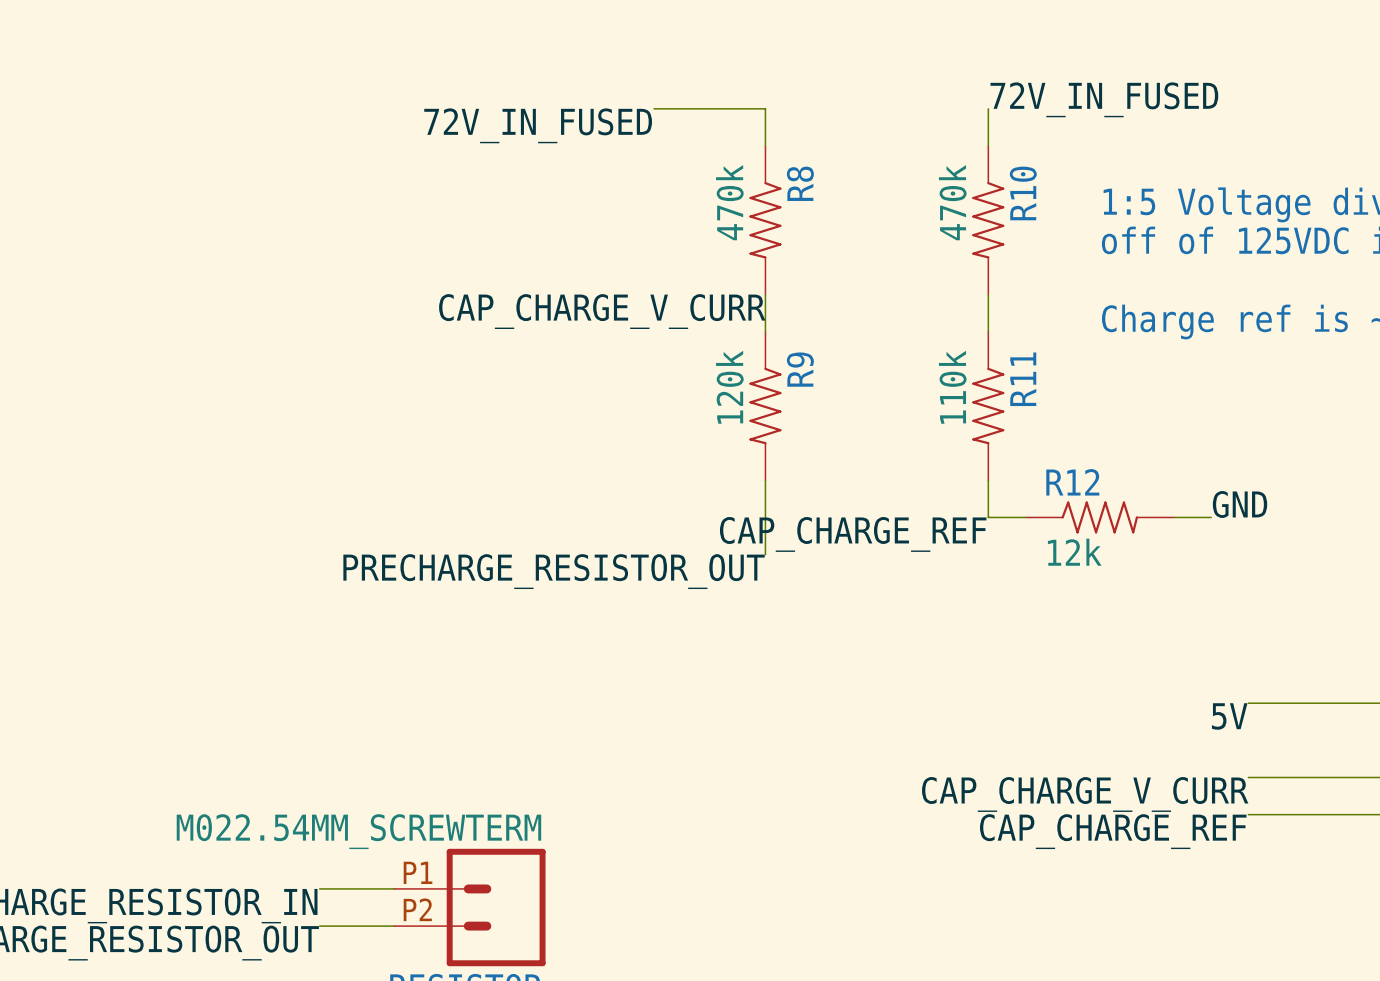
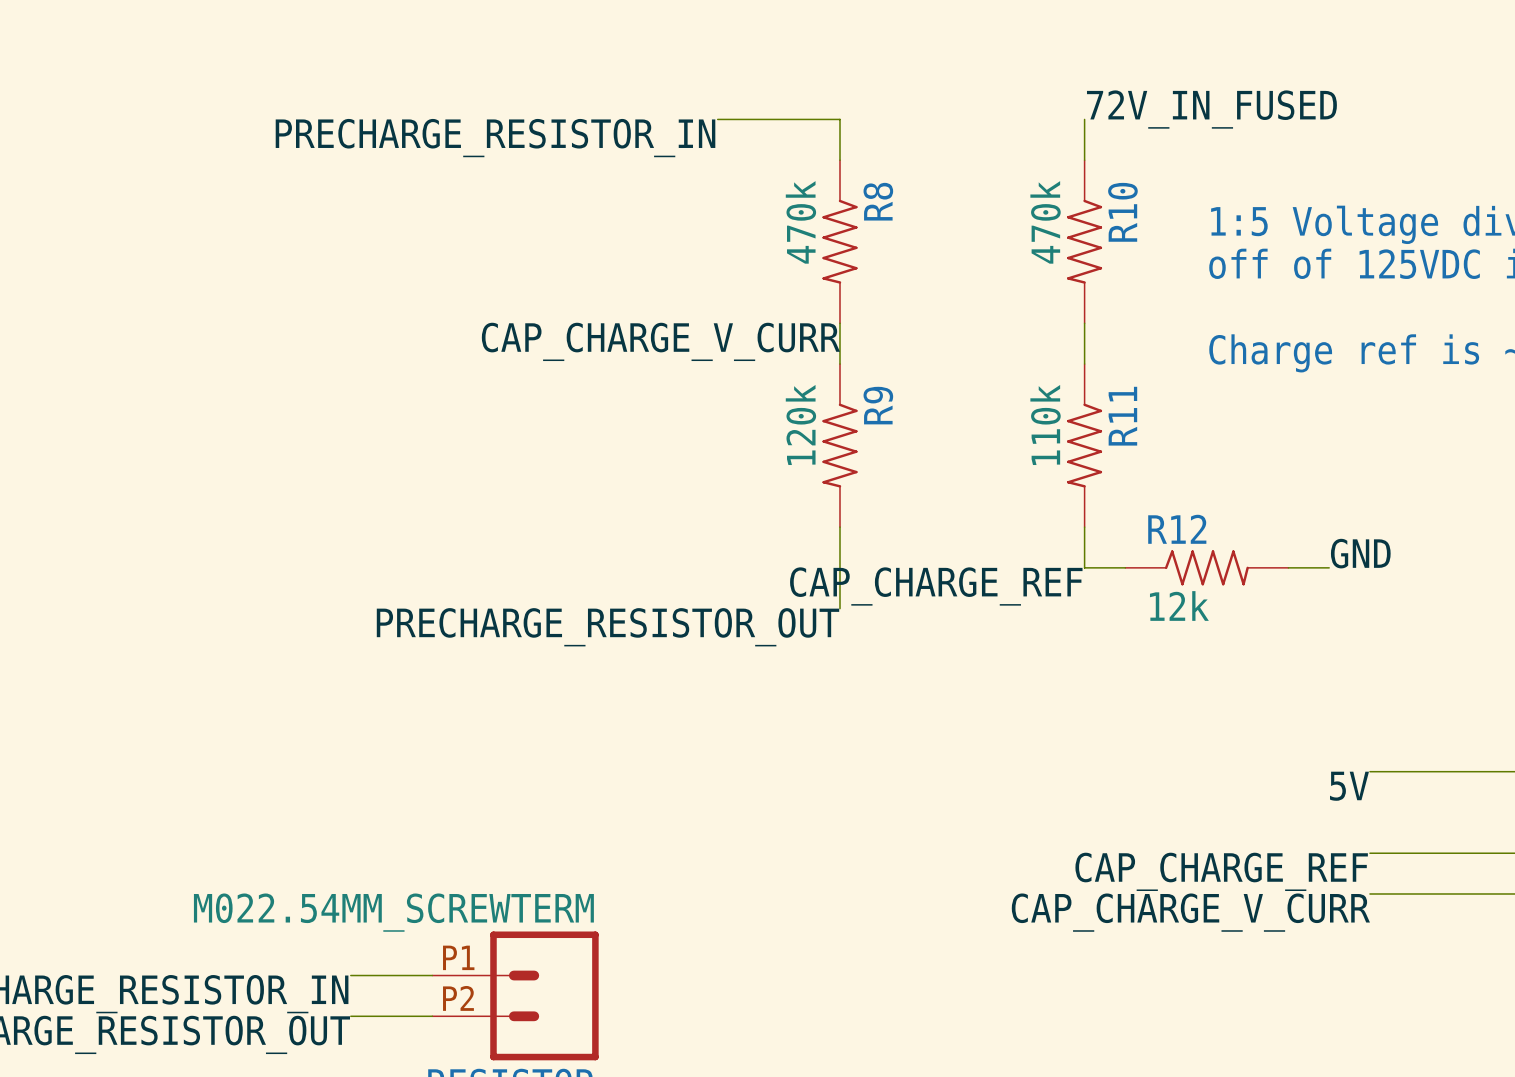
label: 72V_IN_FUSED (538, 125) -> PRECHARGE_RESISTOR_IN (495, 138)
label: CAP_CHARGE_V_CURR (1085, 794) -> CAP_CHARGE_REF (1221, 871)
label: CAP_CHARGE_REF (1113, 831) -> CAP_CHARGE_V_CURR (1190, 912)

